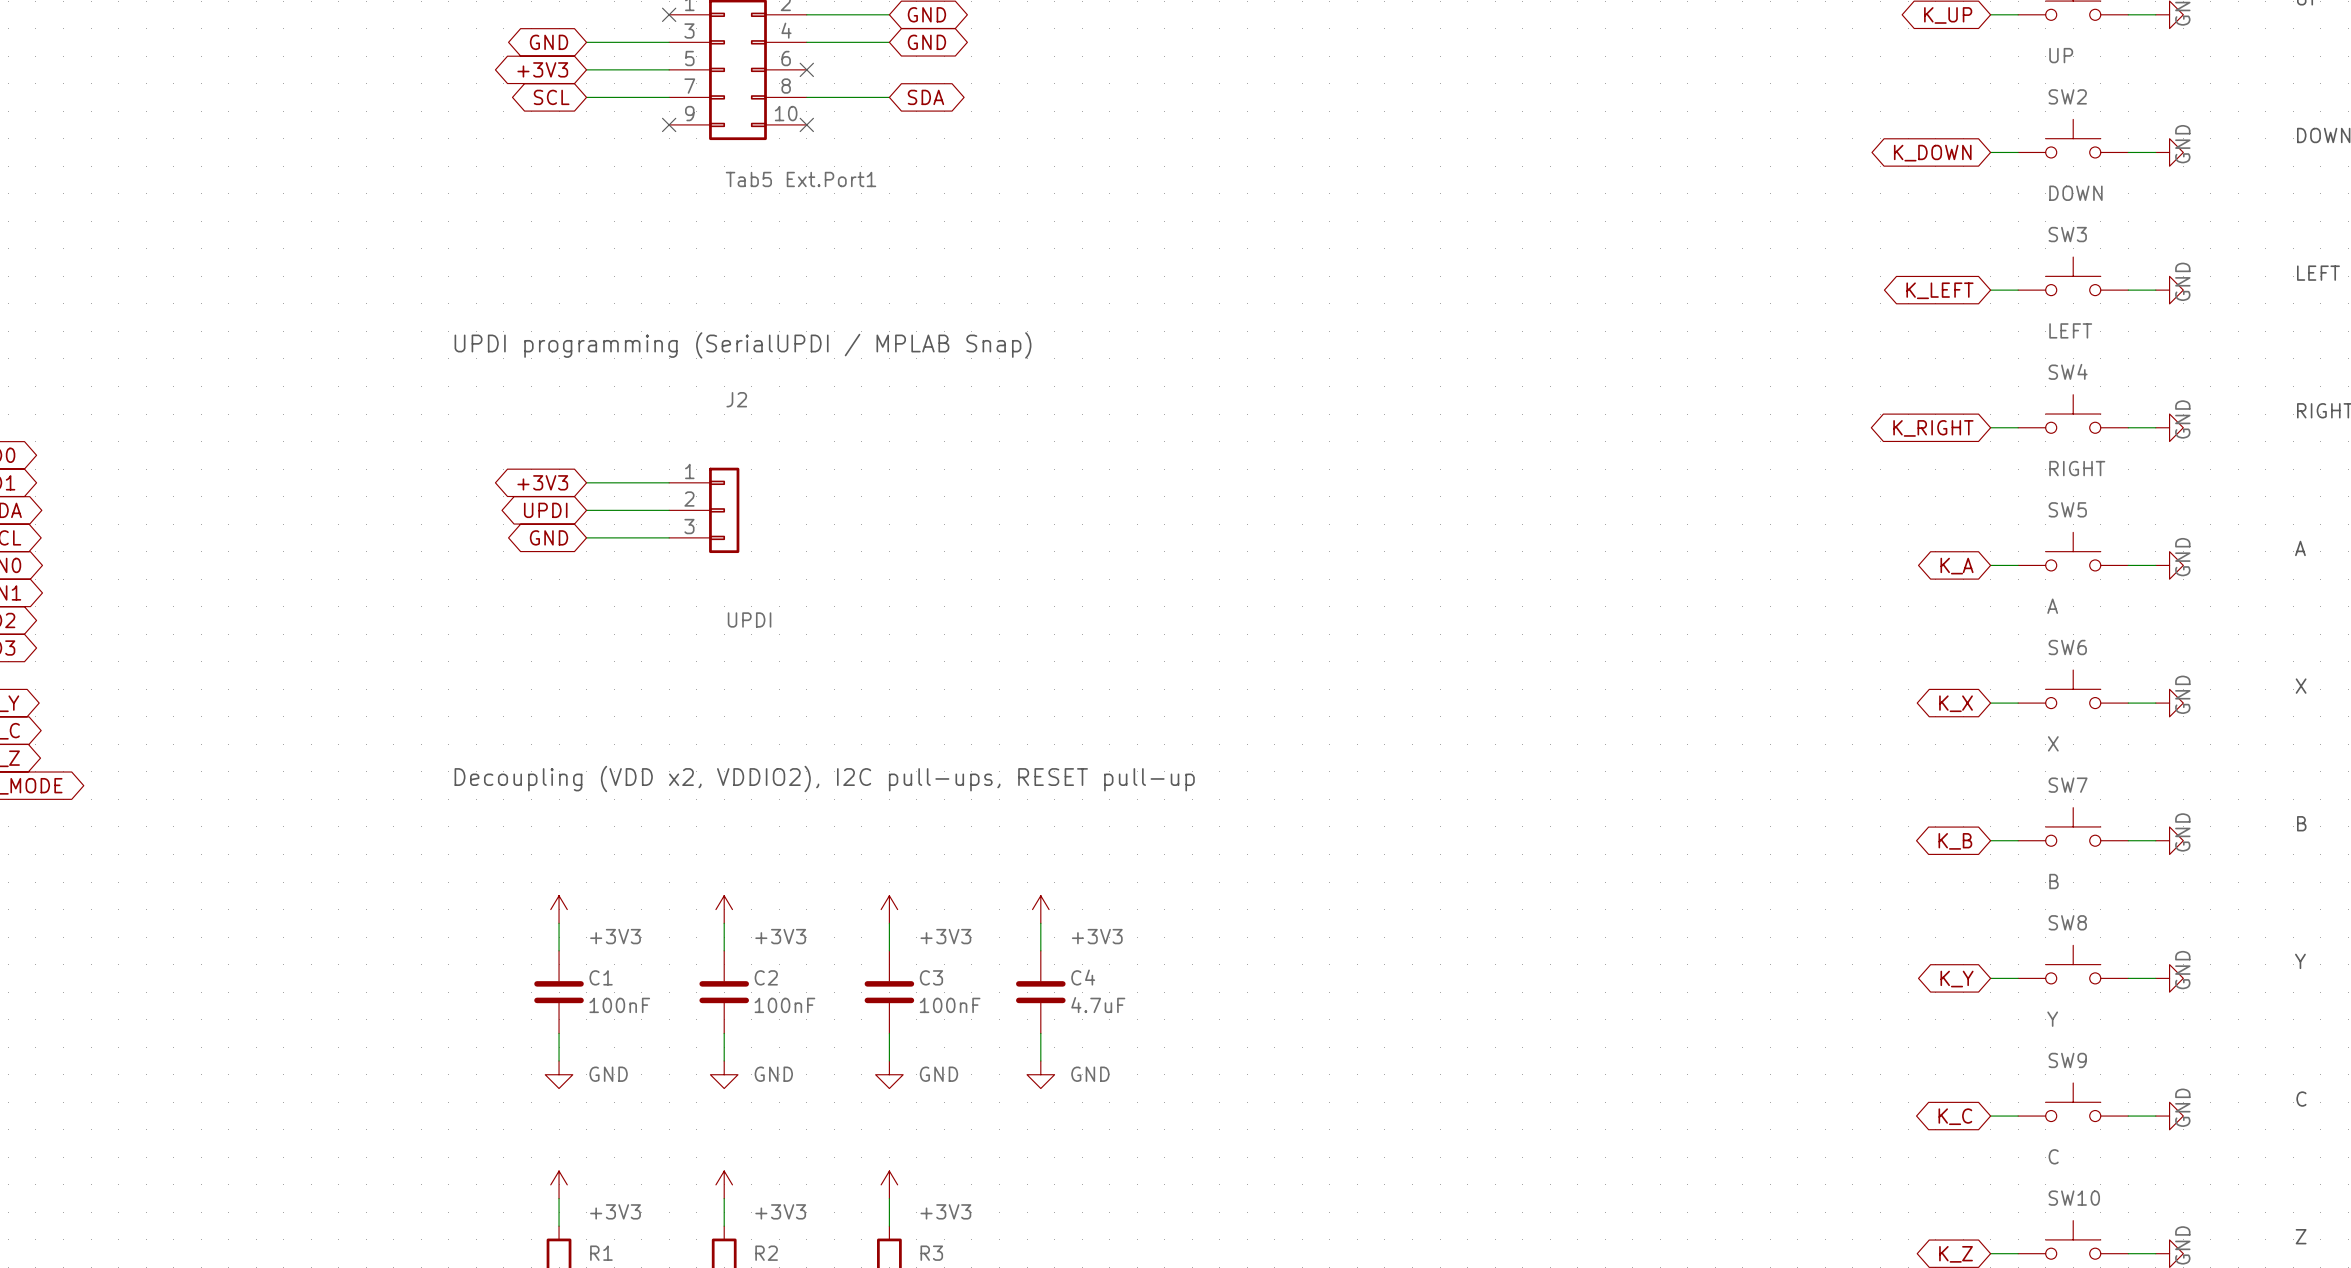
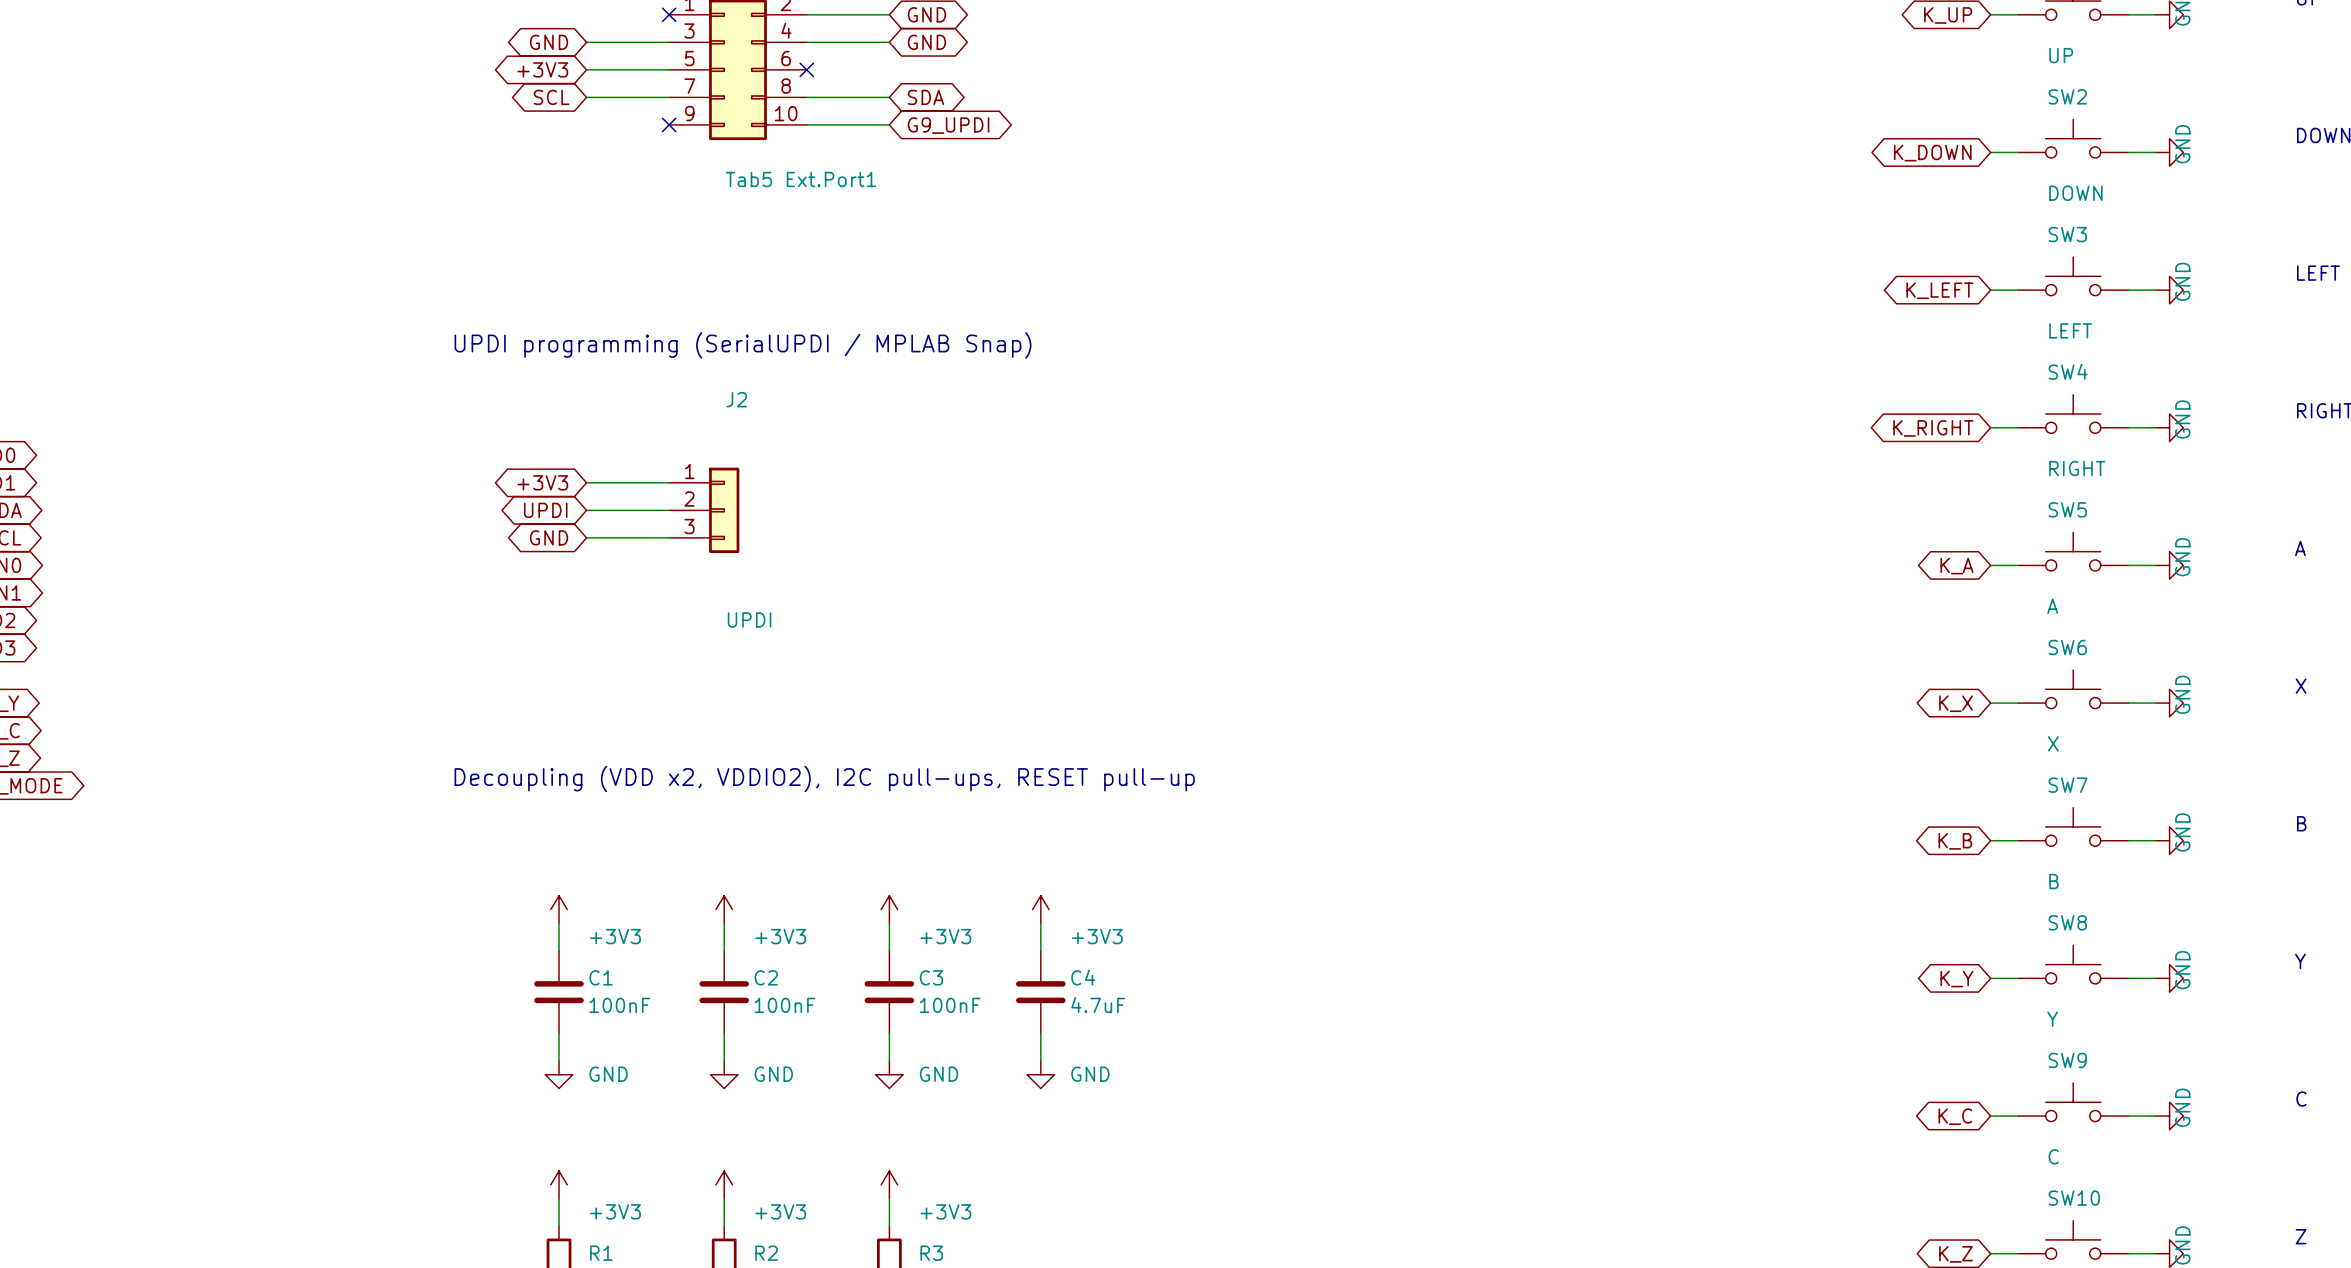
wire: none -> (806, 124) (889, 124)
no-connect mark: (806, 124) -> none
global label: none -> G9_UPDI (948, 125)

